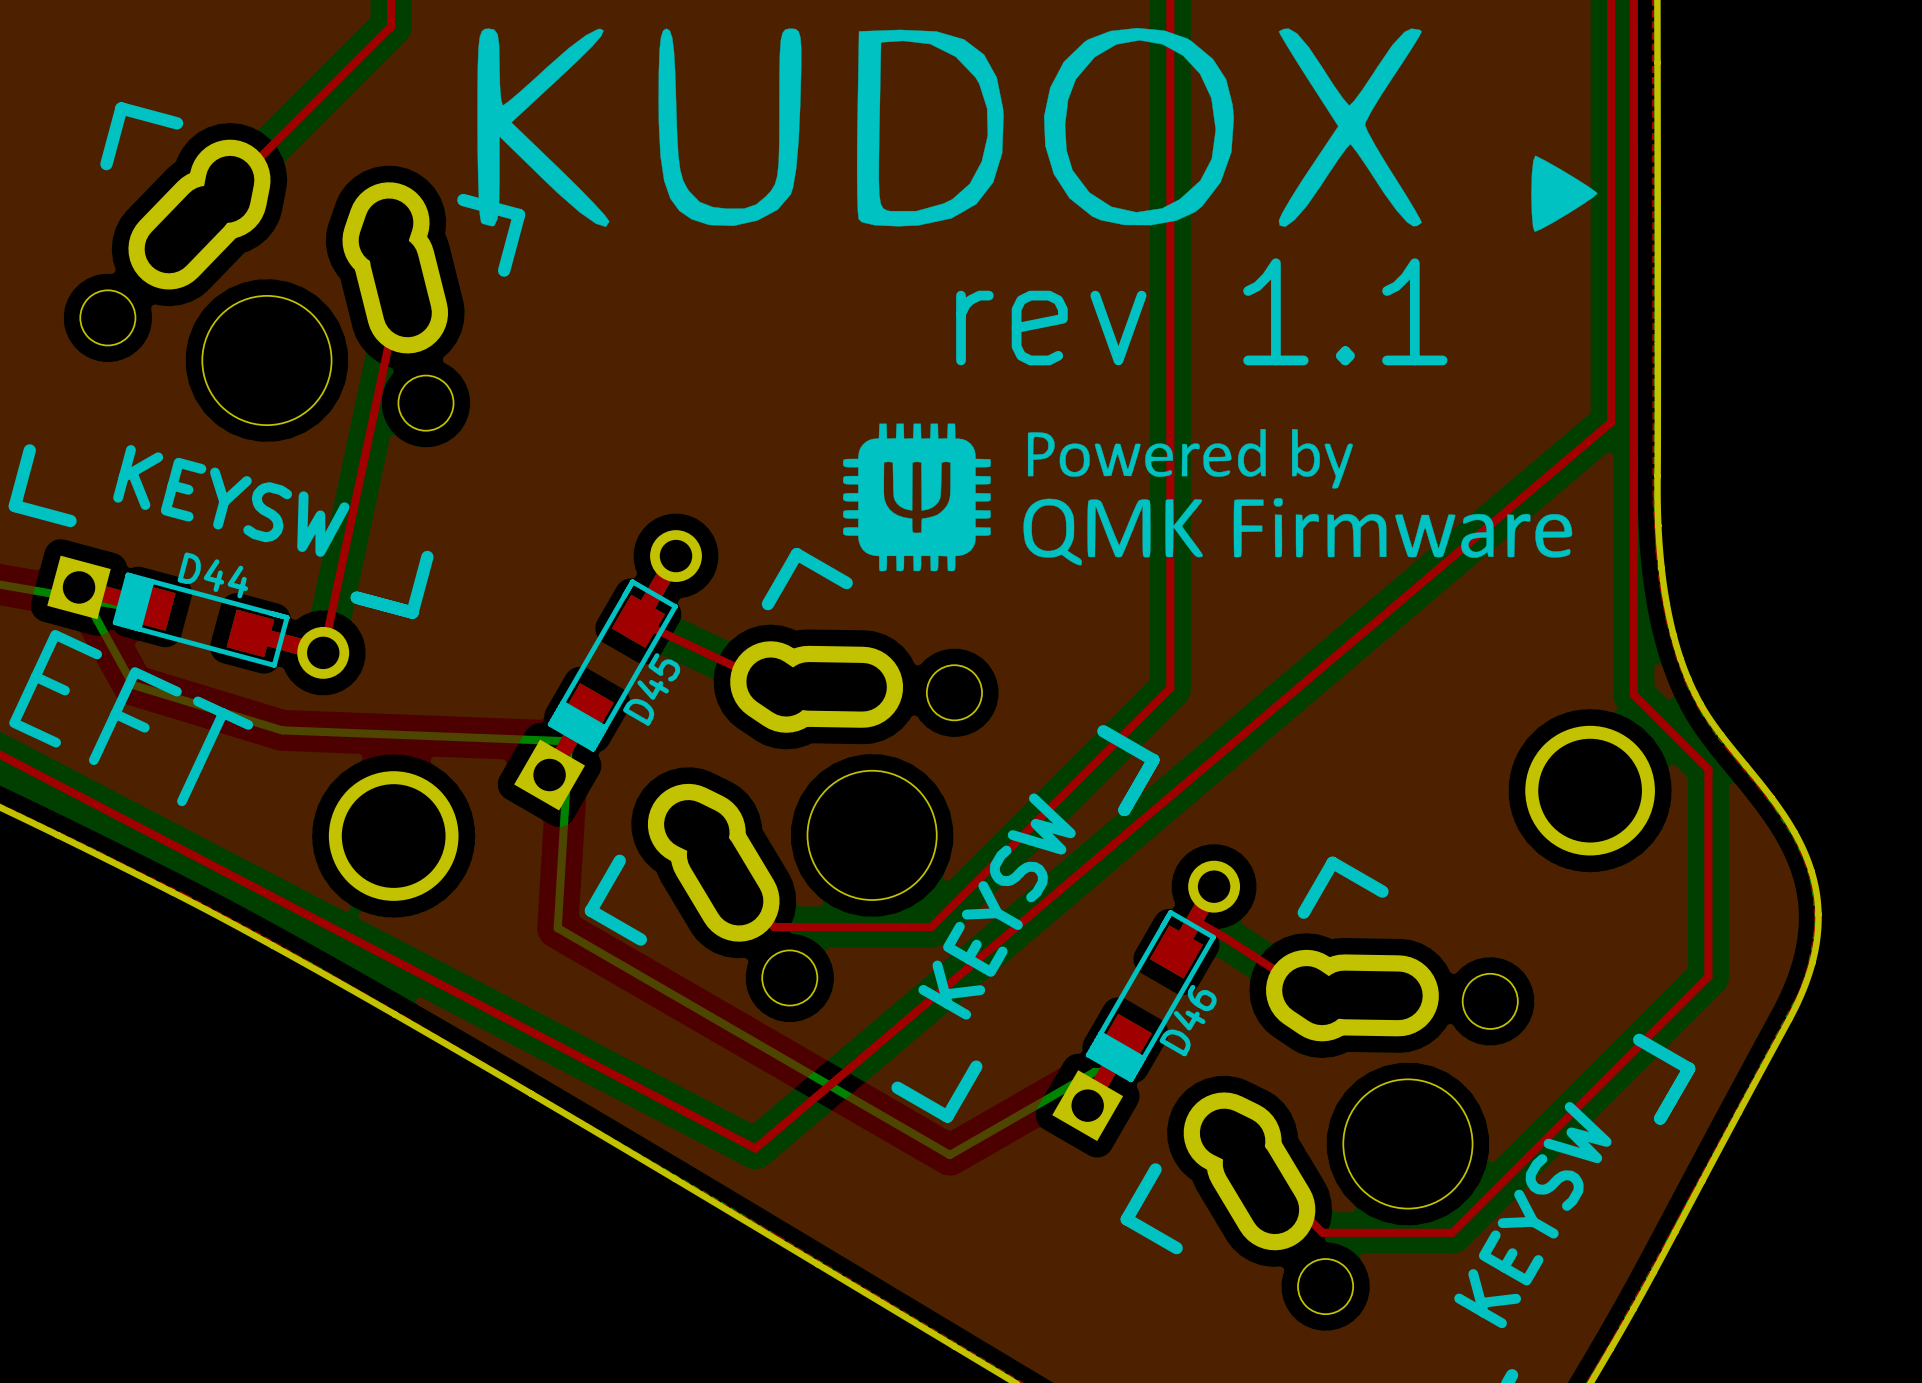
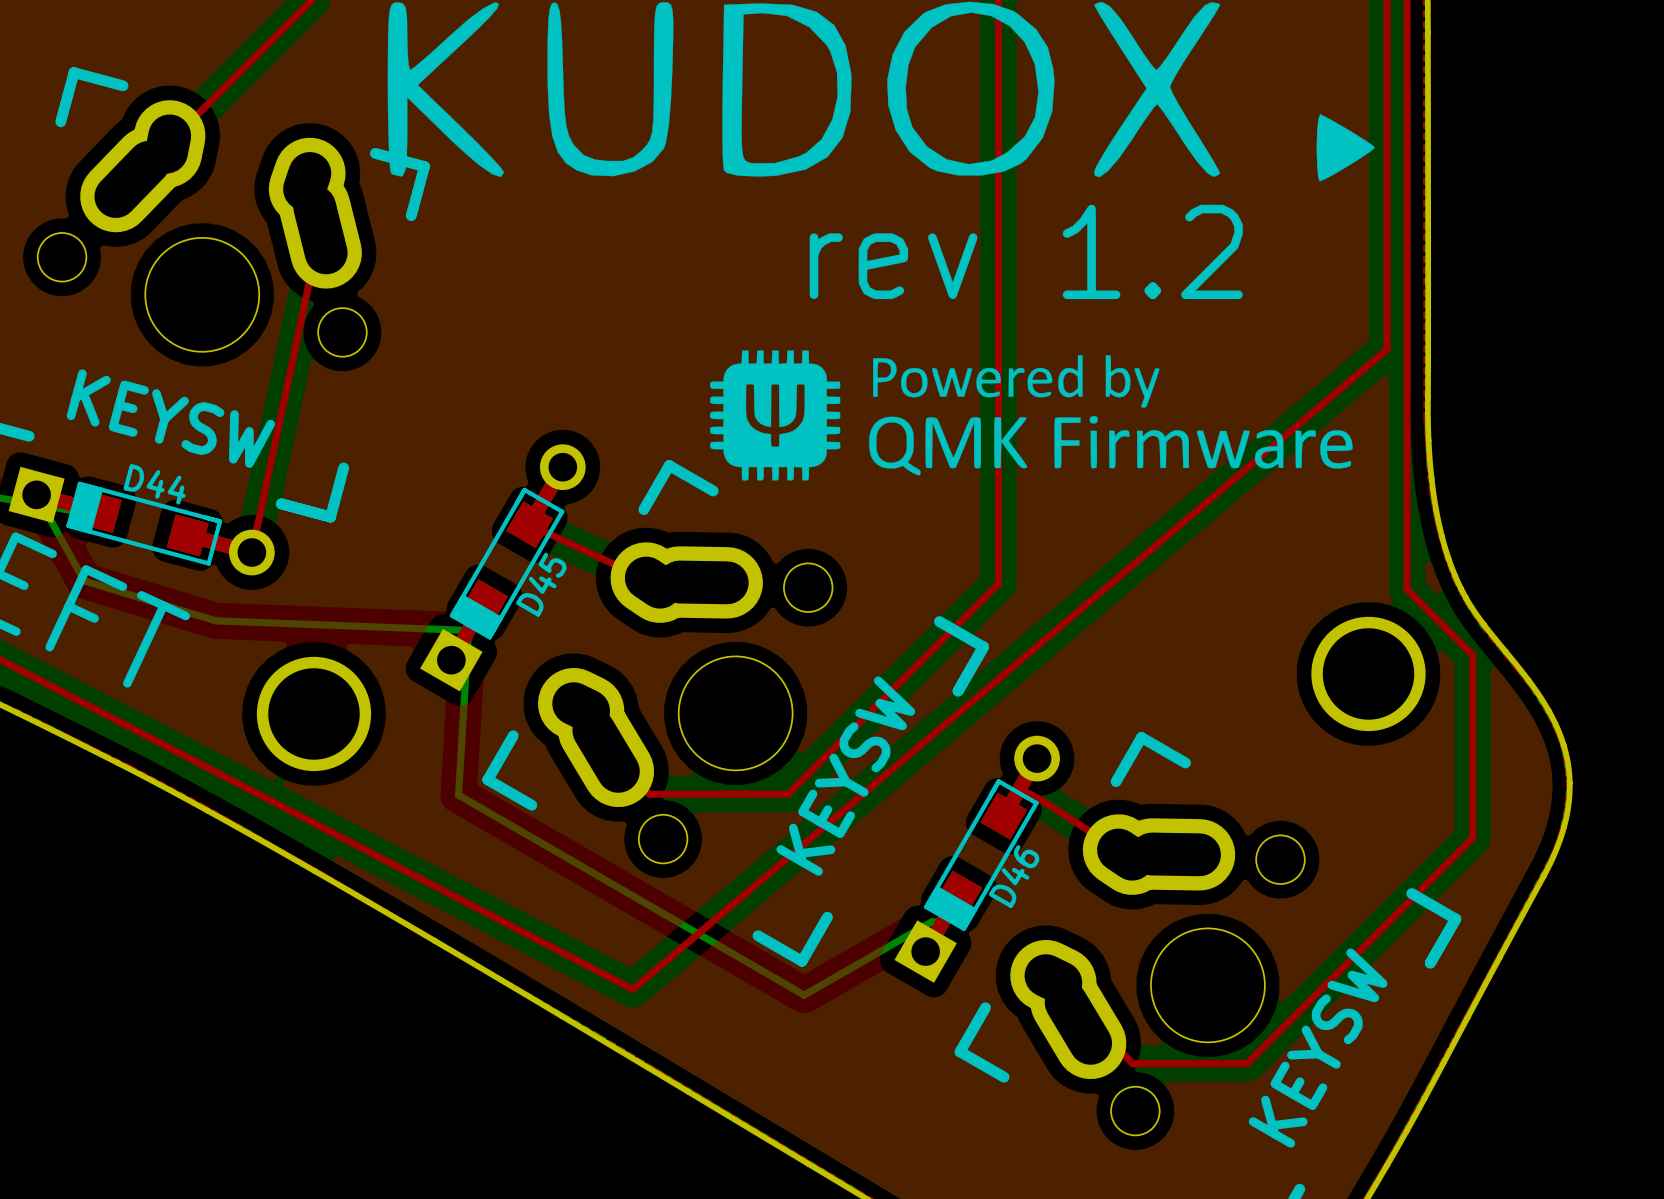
text: rev 1.1 (1201, 311) -> rev 1.2 (1026, 251)

